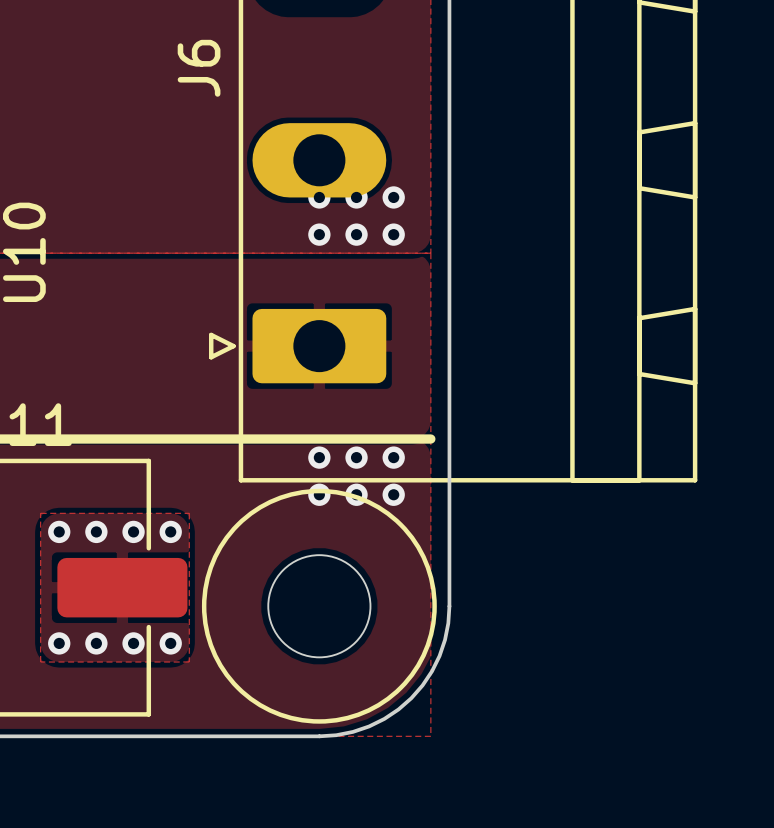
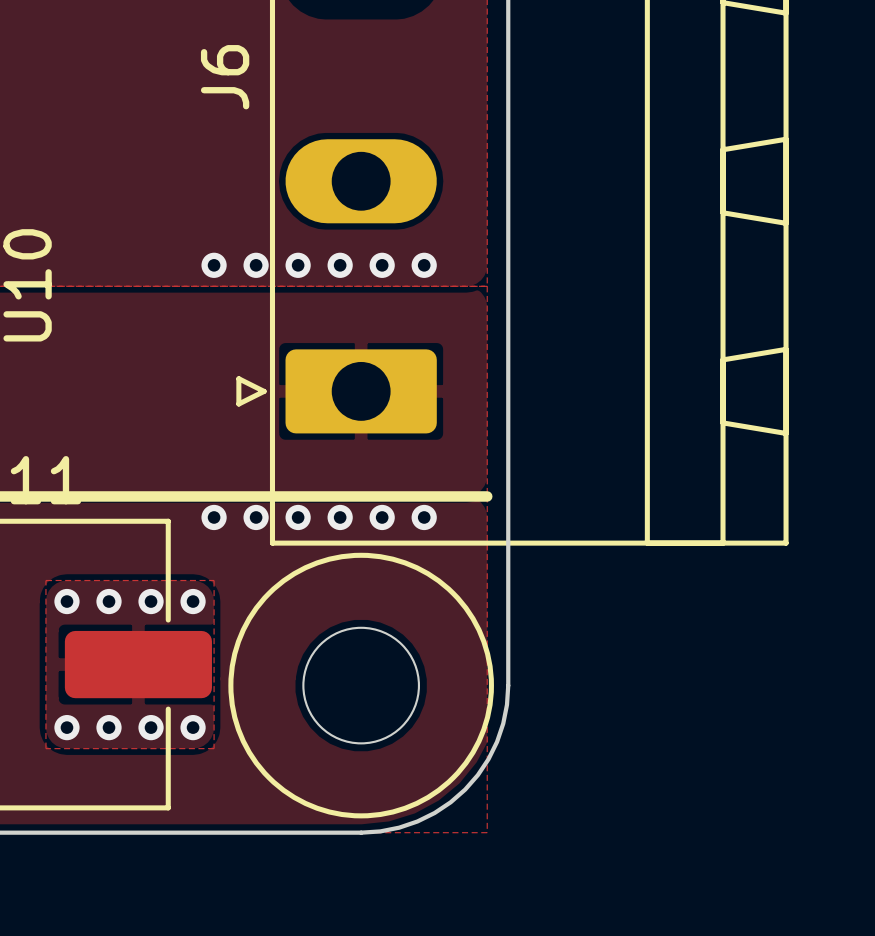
via: (319, 197) -> none
via: (356, 197) -> none
via: (393, 197) -> none
via: none -> (214, 265)
via: none -> (256, 265)
via: none -> (298, 265)
via: none -> (340, 265)
via: (319, 234) -> none
via: none -> (382, 265)
via: (356, 234) -> none
via: none -> (424, 265)
via: (393, 234) -> none
via: none -> (214, 517)
via: none -> (256, 517)
via: none -> (298, 517)
via: none -> (340, 517)
via: (319, 457) -> none
via: none -> (382, 517)
via: (356, 457) -> none
via: none -> (424, 517)
via: (393, 457) -> none
via: (319, 494) -> none
via: (356, 494) -> none
via: (393, 494) -> none

